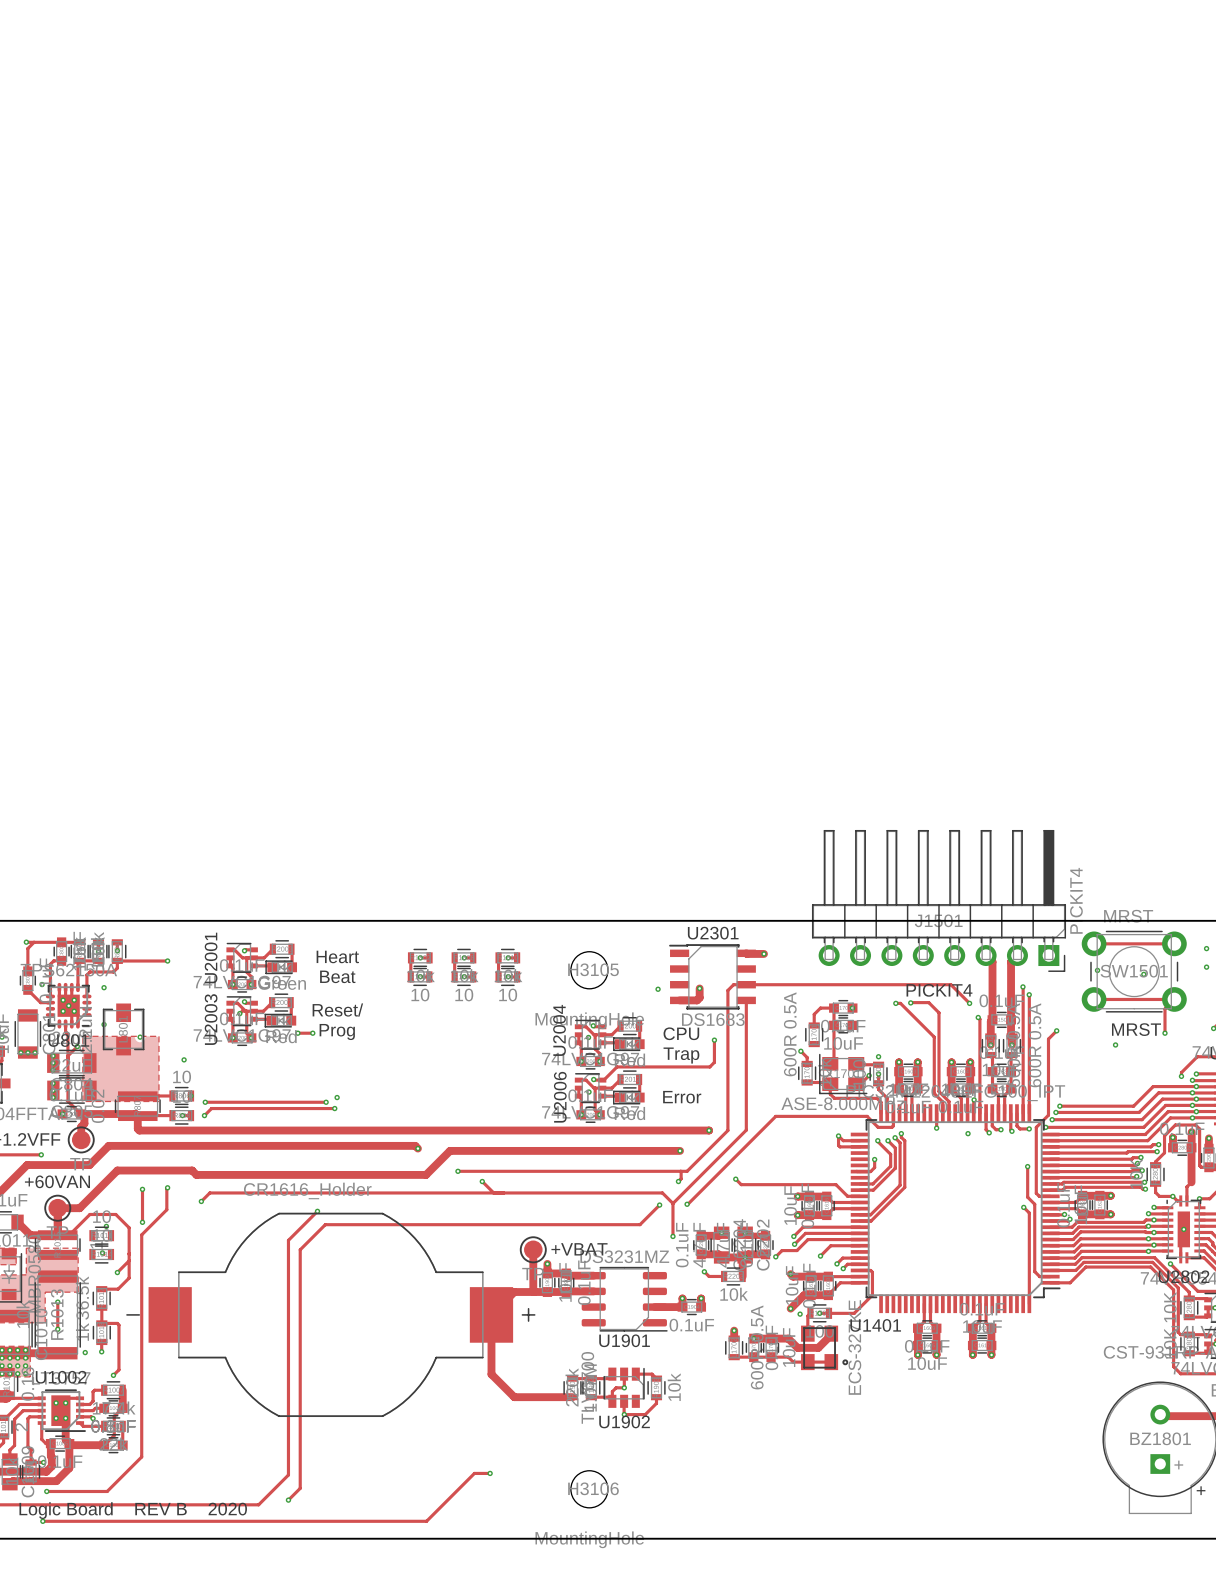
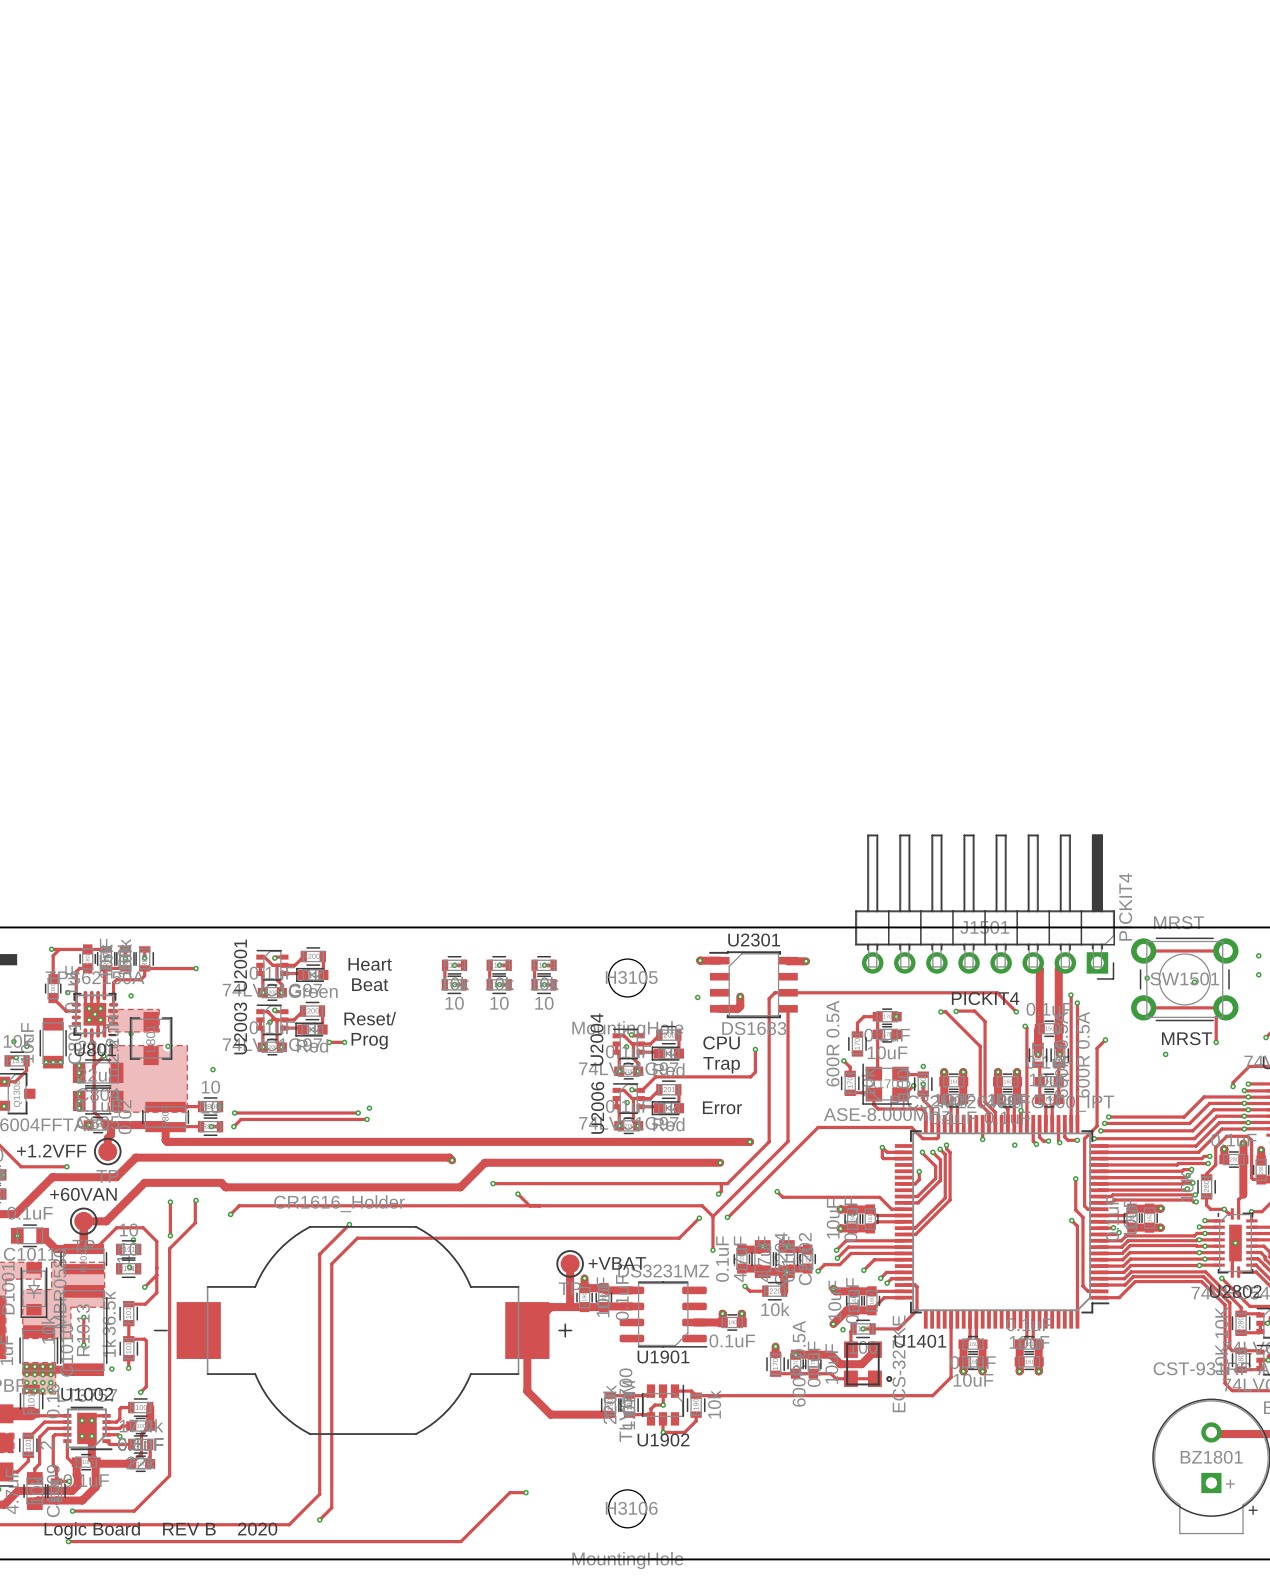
track: none -> (700, 960) (719, 960)
via: none -> (700, 960)
zone outline: none -> (108, 1009) (159, 1009) (159, 1031) (108, 1031) (108, 1009)
track: none -> (951, 1319) (951, 1377) (932, 1395) (696, 1395)

